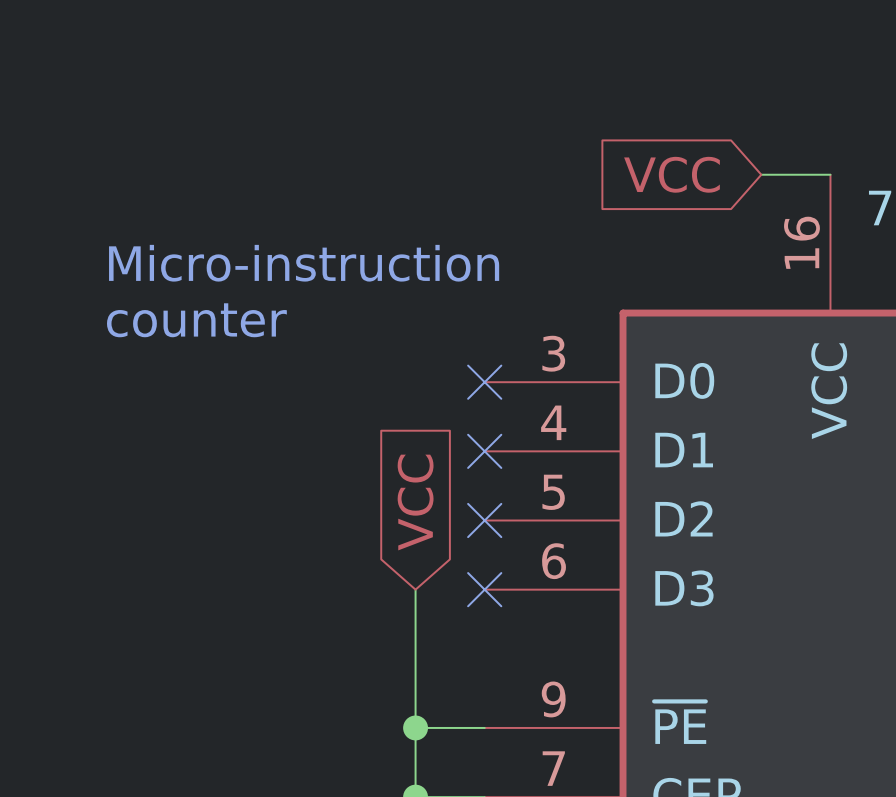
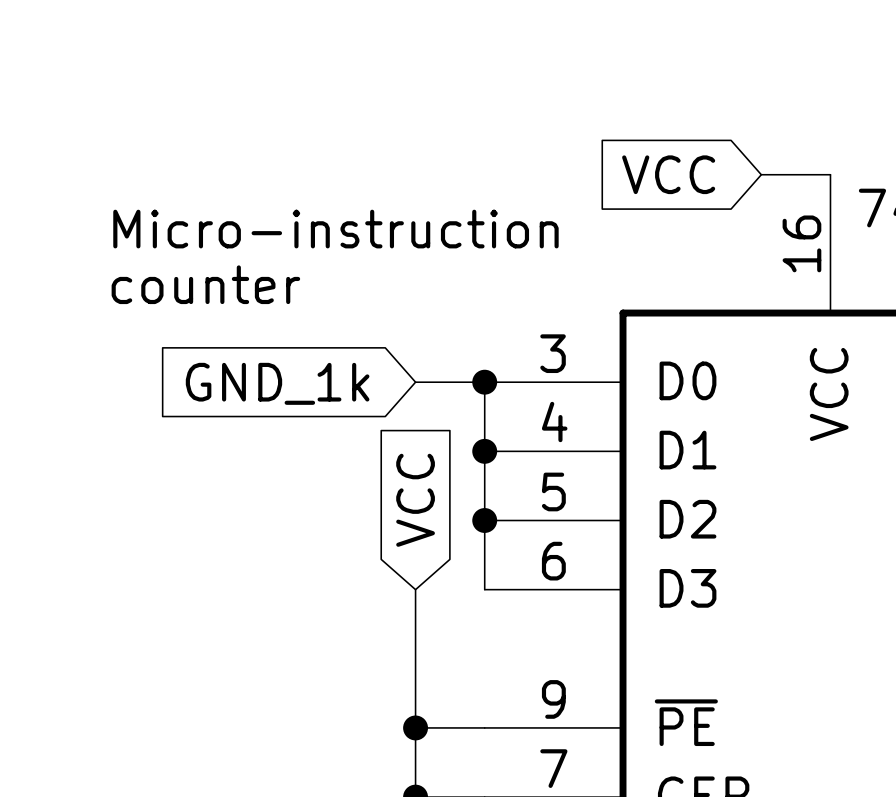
text position: Micro-instruction (304, 263) -> Micro-instruction (335, 229)
text position: counter (196, 320) -> counter (205, 284)
wire: none -> (415, 382) (484, 382) (484, 589)
no-connect mark: (484, 382) -> none
junction: none -> (484, 382)
global label: none -> GND_1k (277, 383)
no-connect mark: (484, 451) -> none
junction: none -> (484, 451)
no-connect mark: (484, 520) -> none
junction: none -> (484, 520)
no-connect mark: (484, 589) -> none

